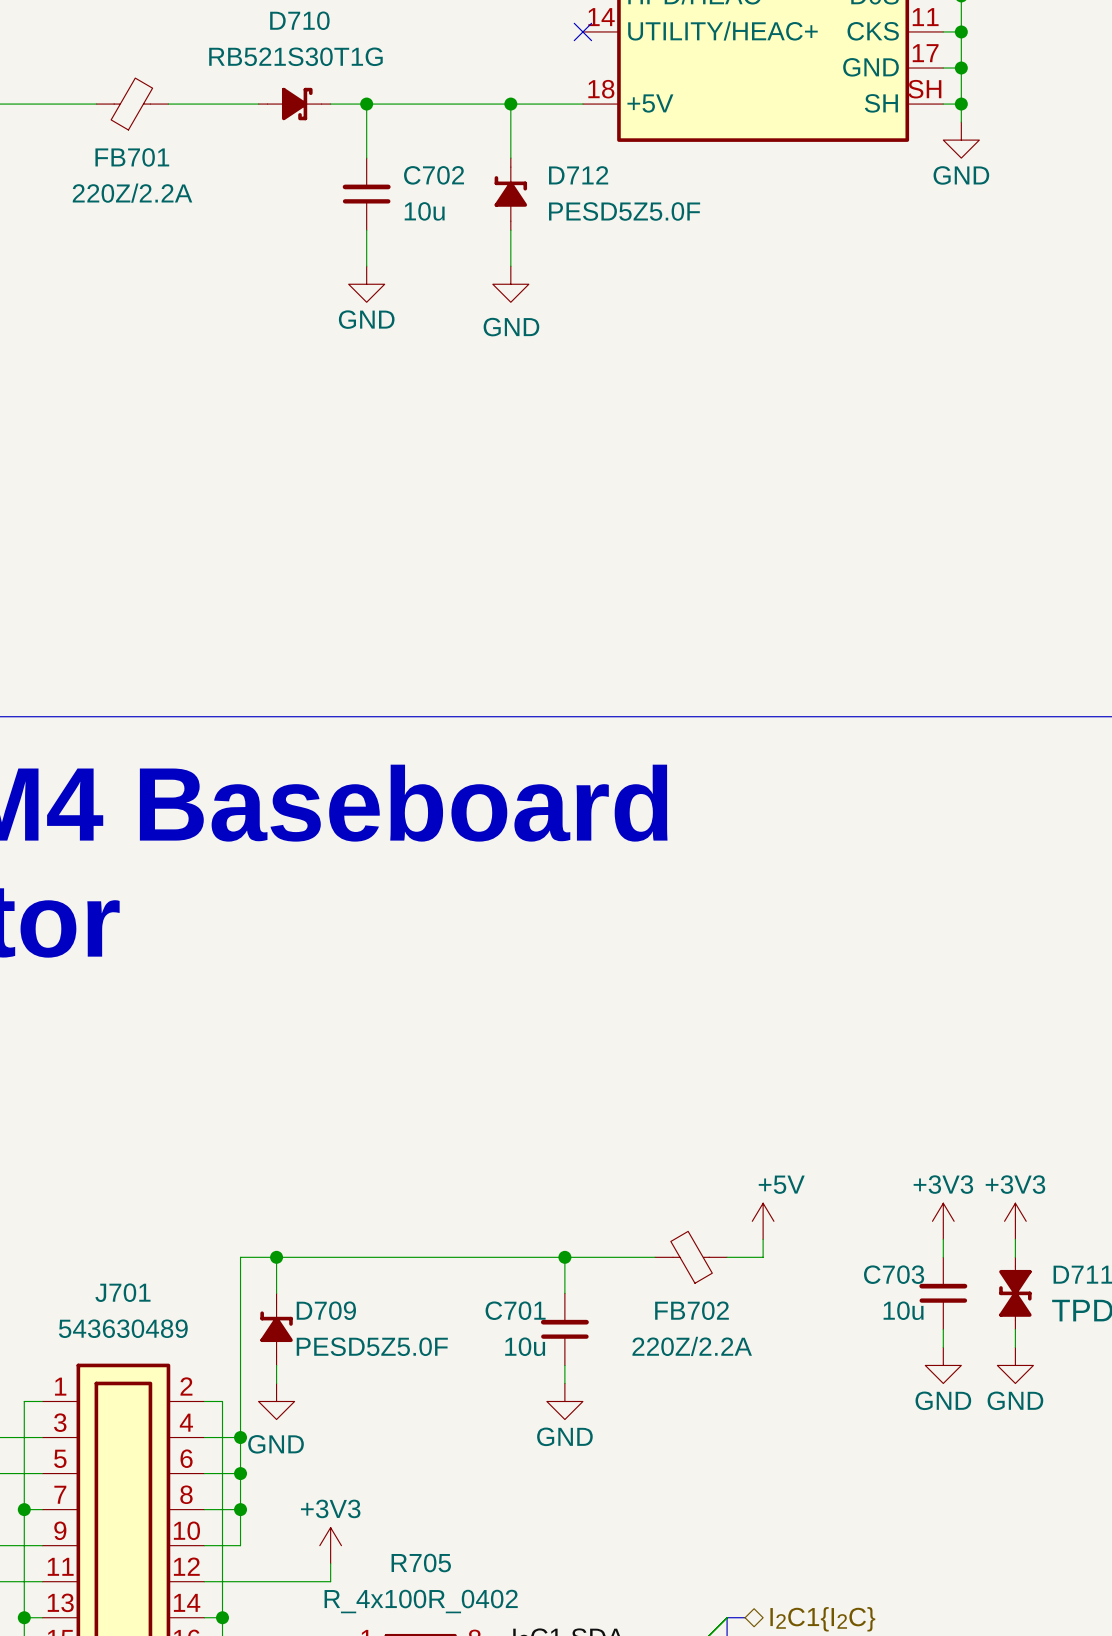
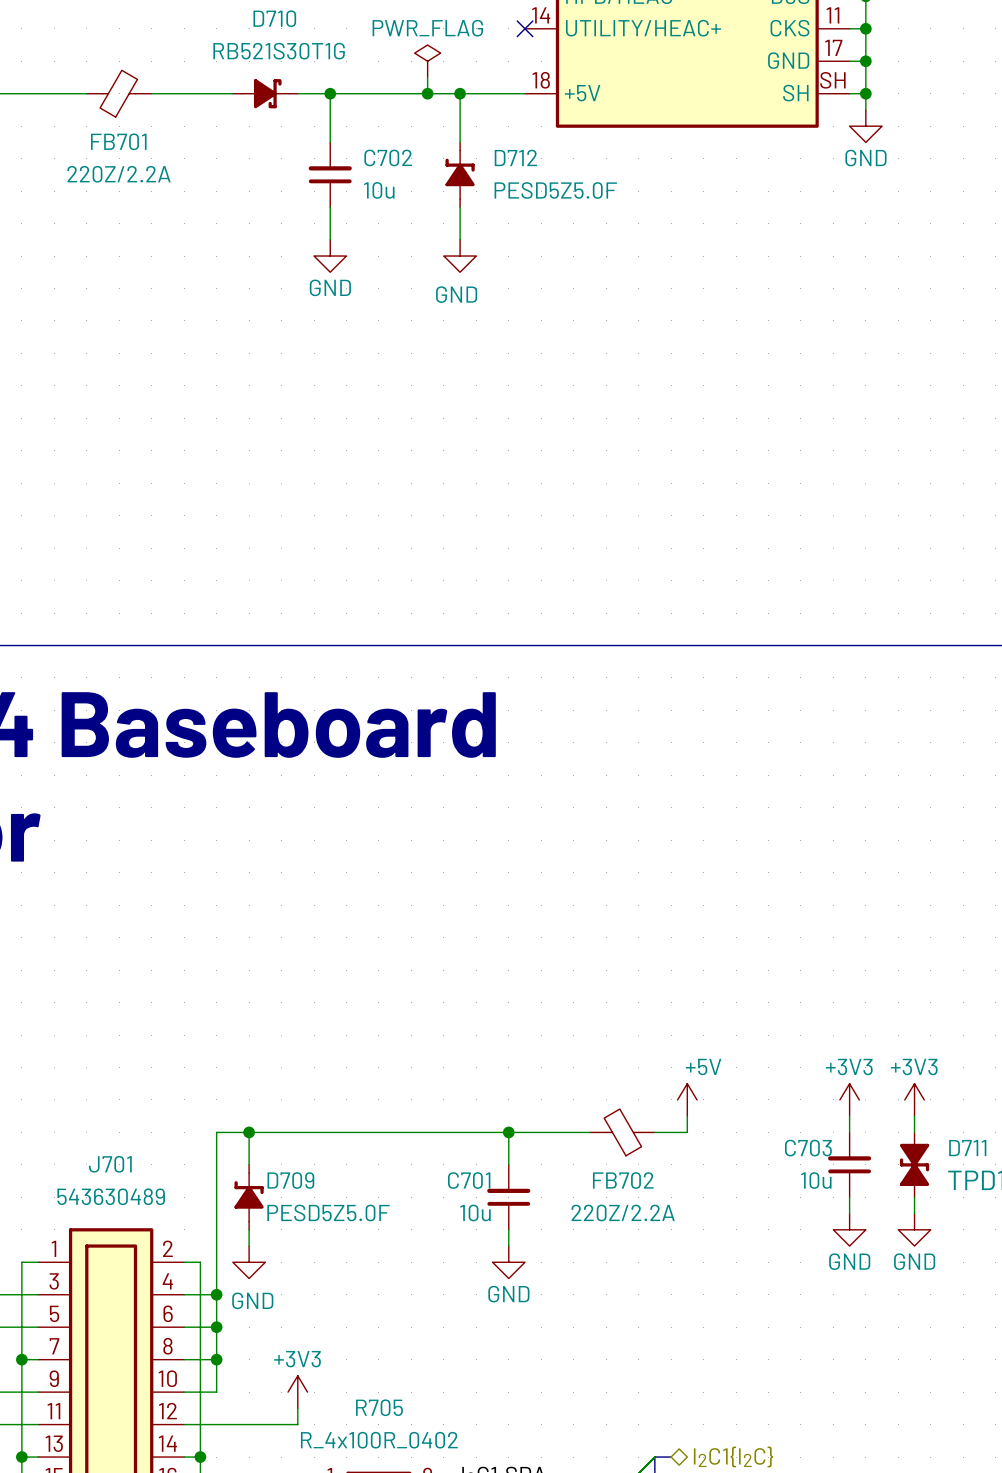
power symbol: none -> PWR_FLAG (427, 61)
wire: none -> (427, 77) (427, 93)
junction: none -> (427, 93)

